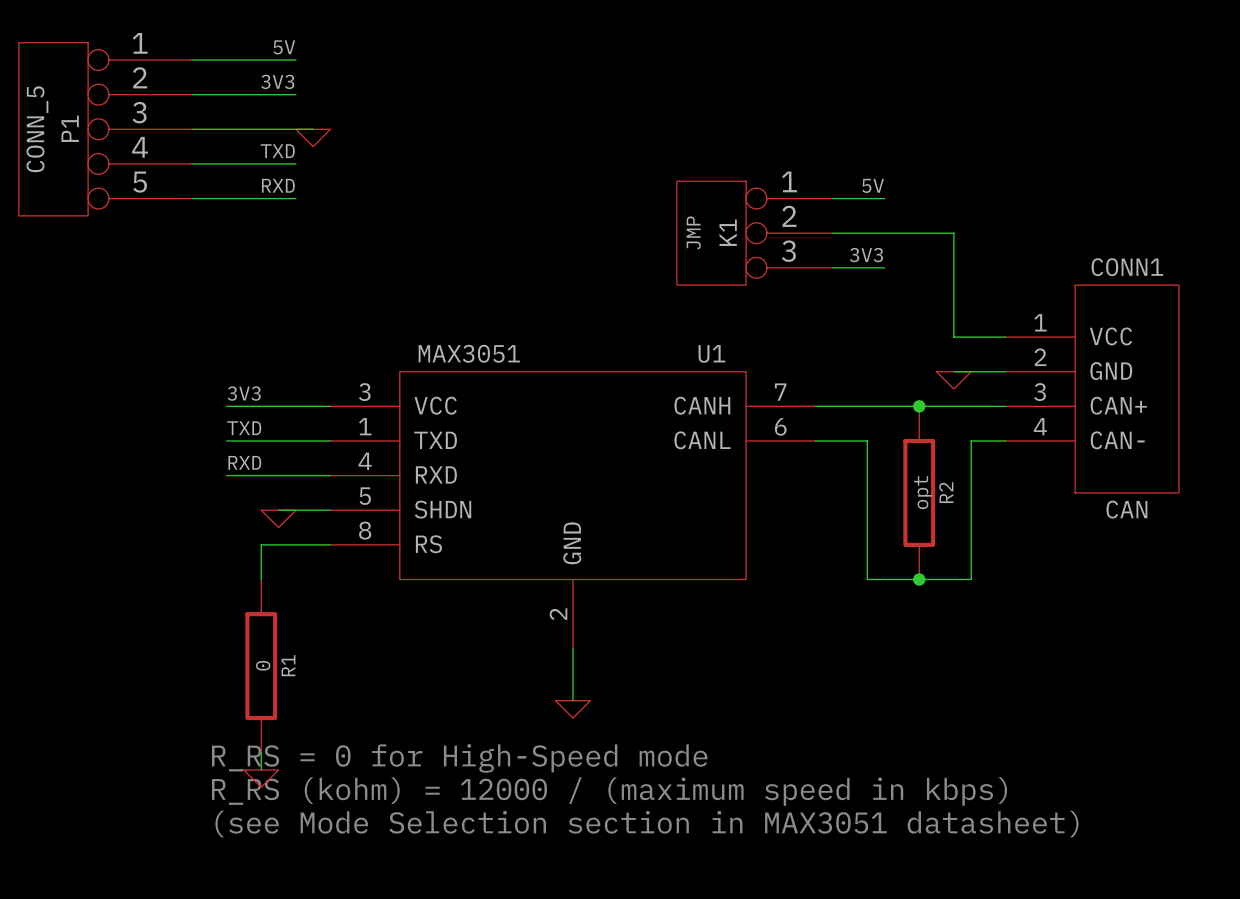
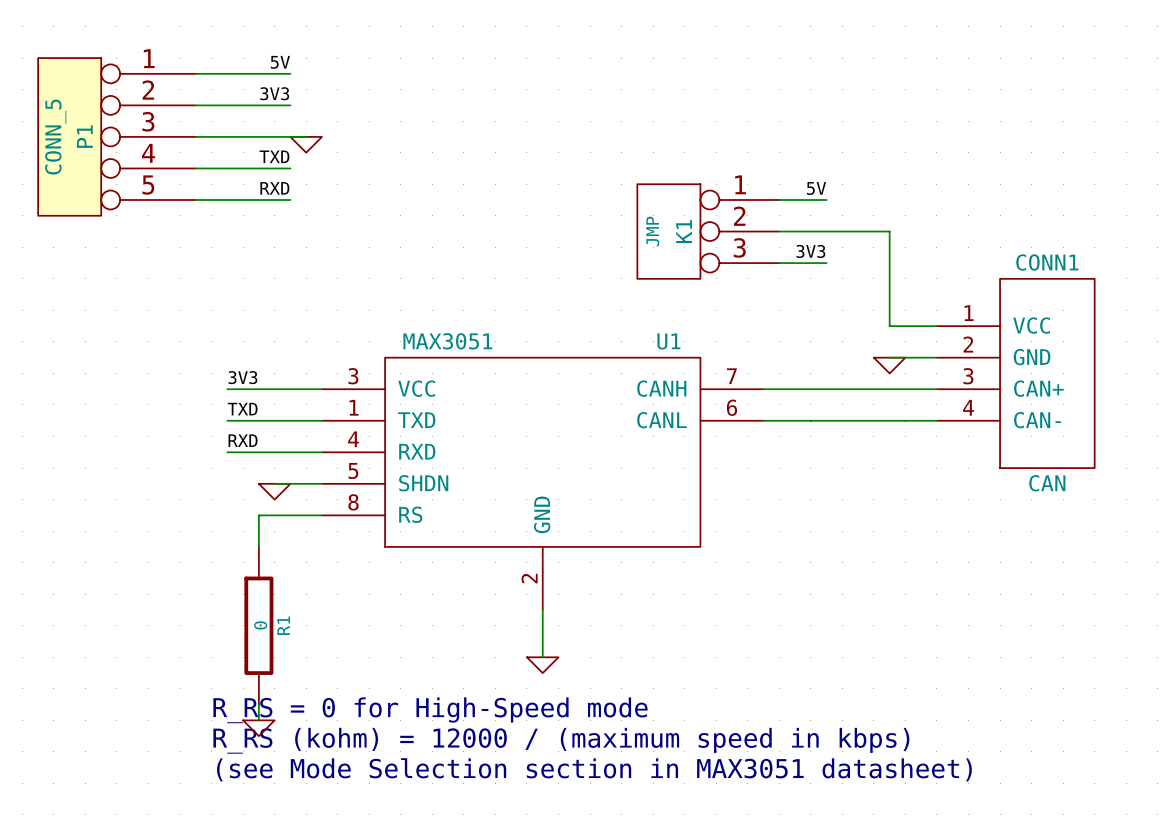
junction: (919, 406) -> none
wire: (867, 440) (867, 579) (971, 579) (971, 440) -> (810, 420) (905, 420)
R2: opt (919, 492) -> none
junction: (919, 579) -> none

